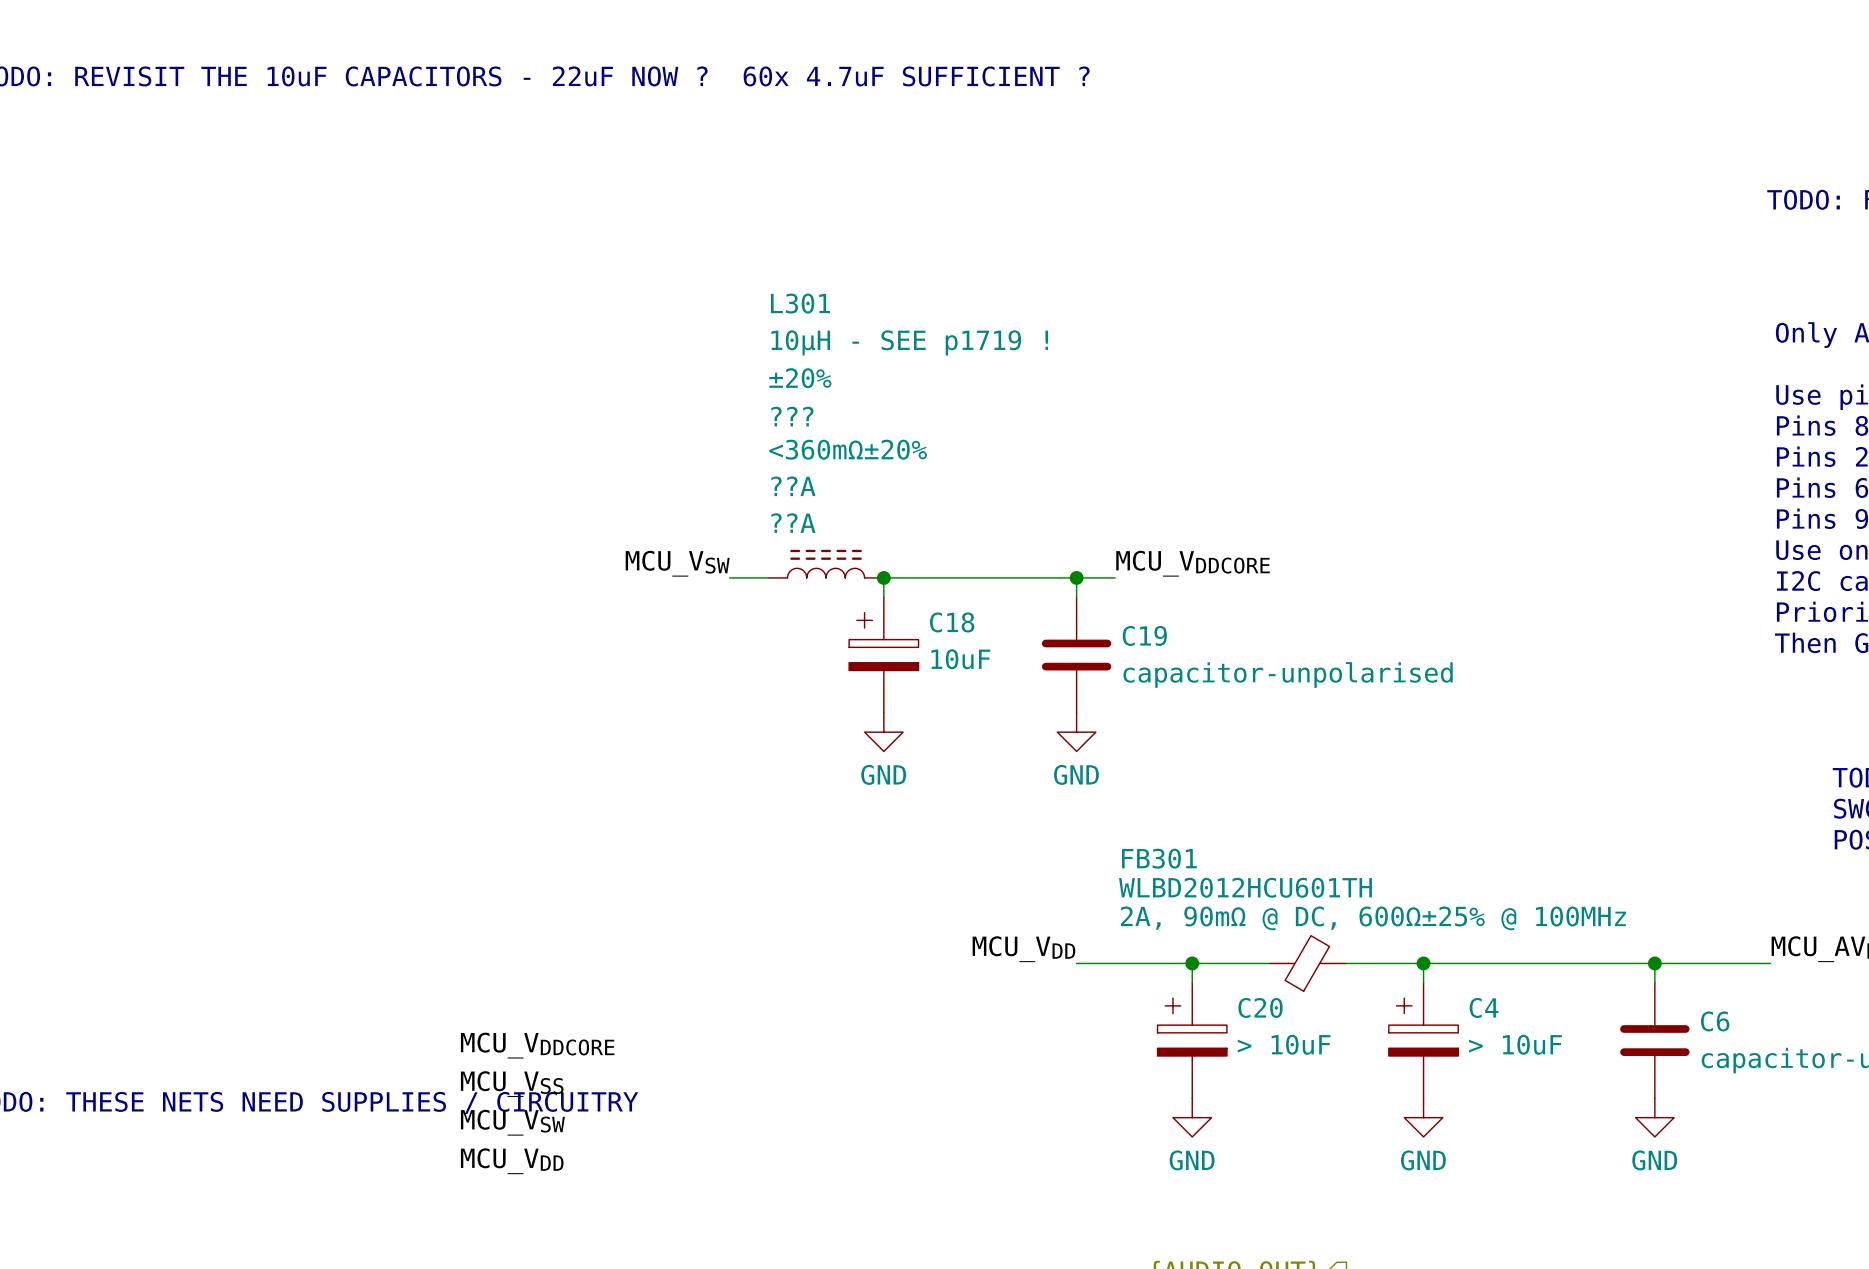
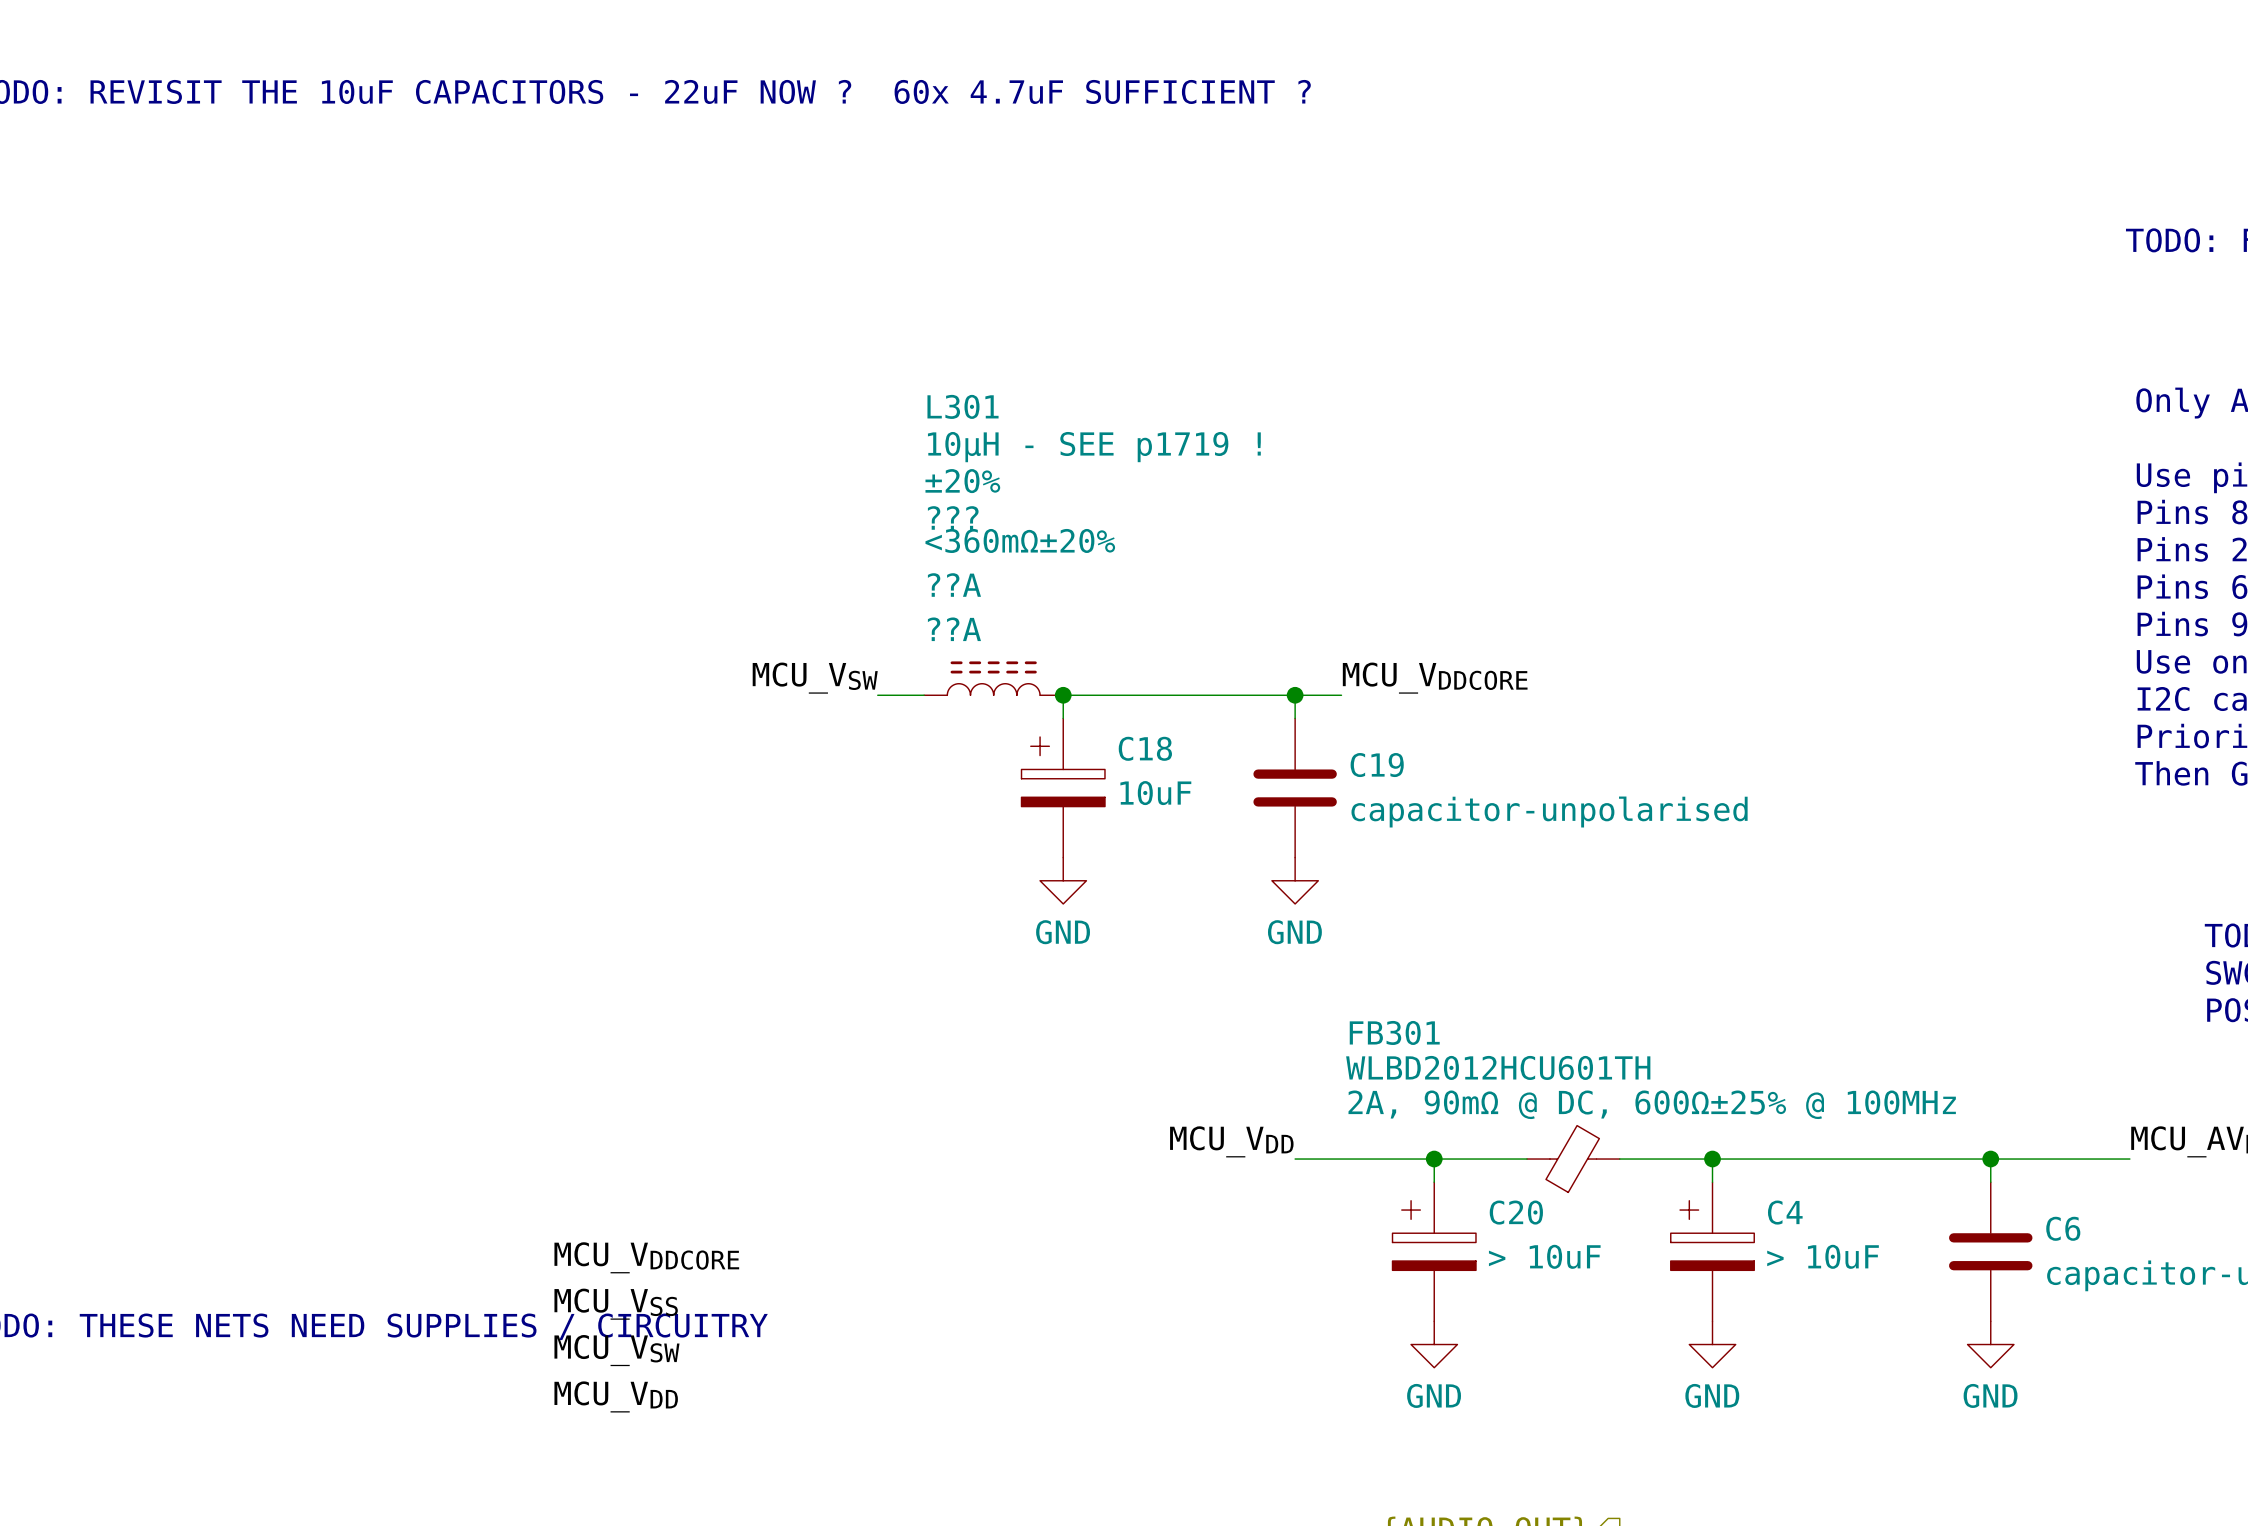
L301 name position: L301 (800, 303) -> L301 (963, 406)
L301 value position: 10μH - SEE p1719 ! (909, 342) -> 10μH - SEE p1719 ! (1094, 447)
L301 text position: ±20% (800, 378) -> ±20% (962, 481)
L301 text position: ??? (792, 416) -> ??? (953, 517)

